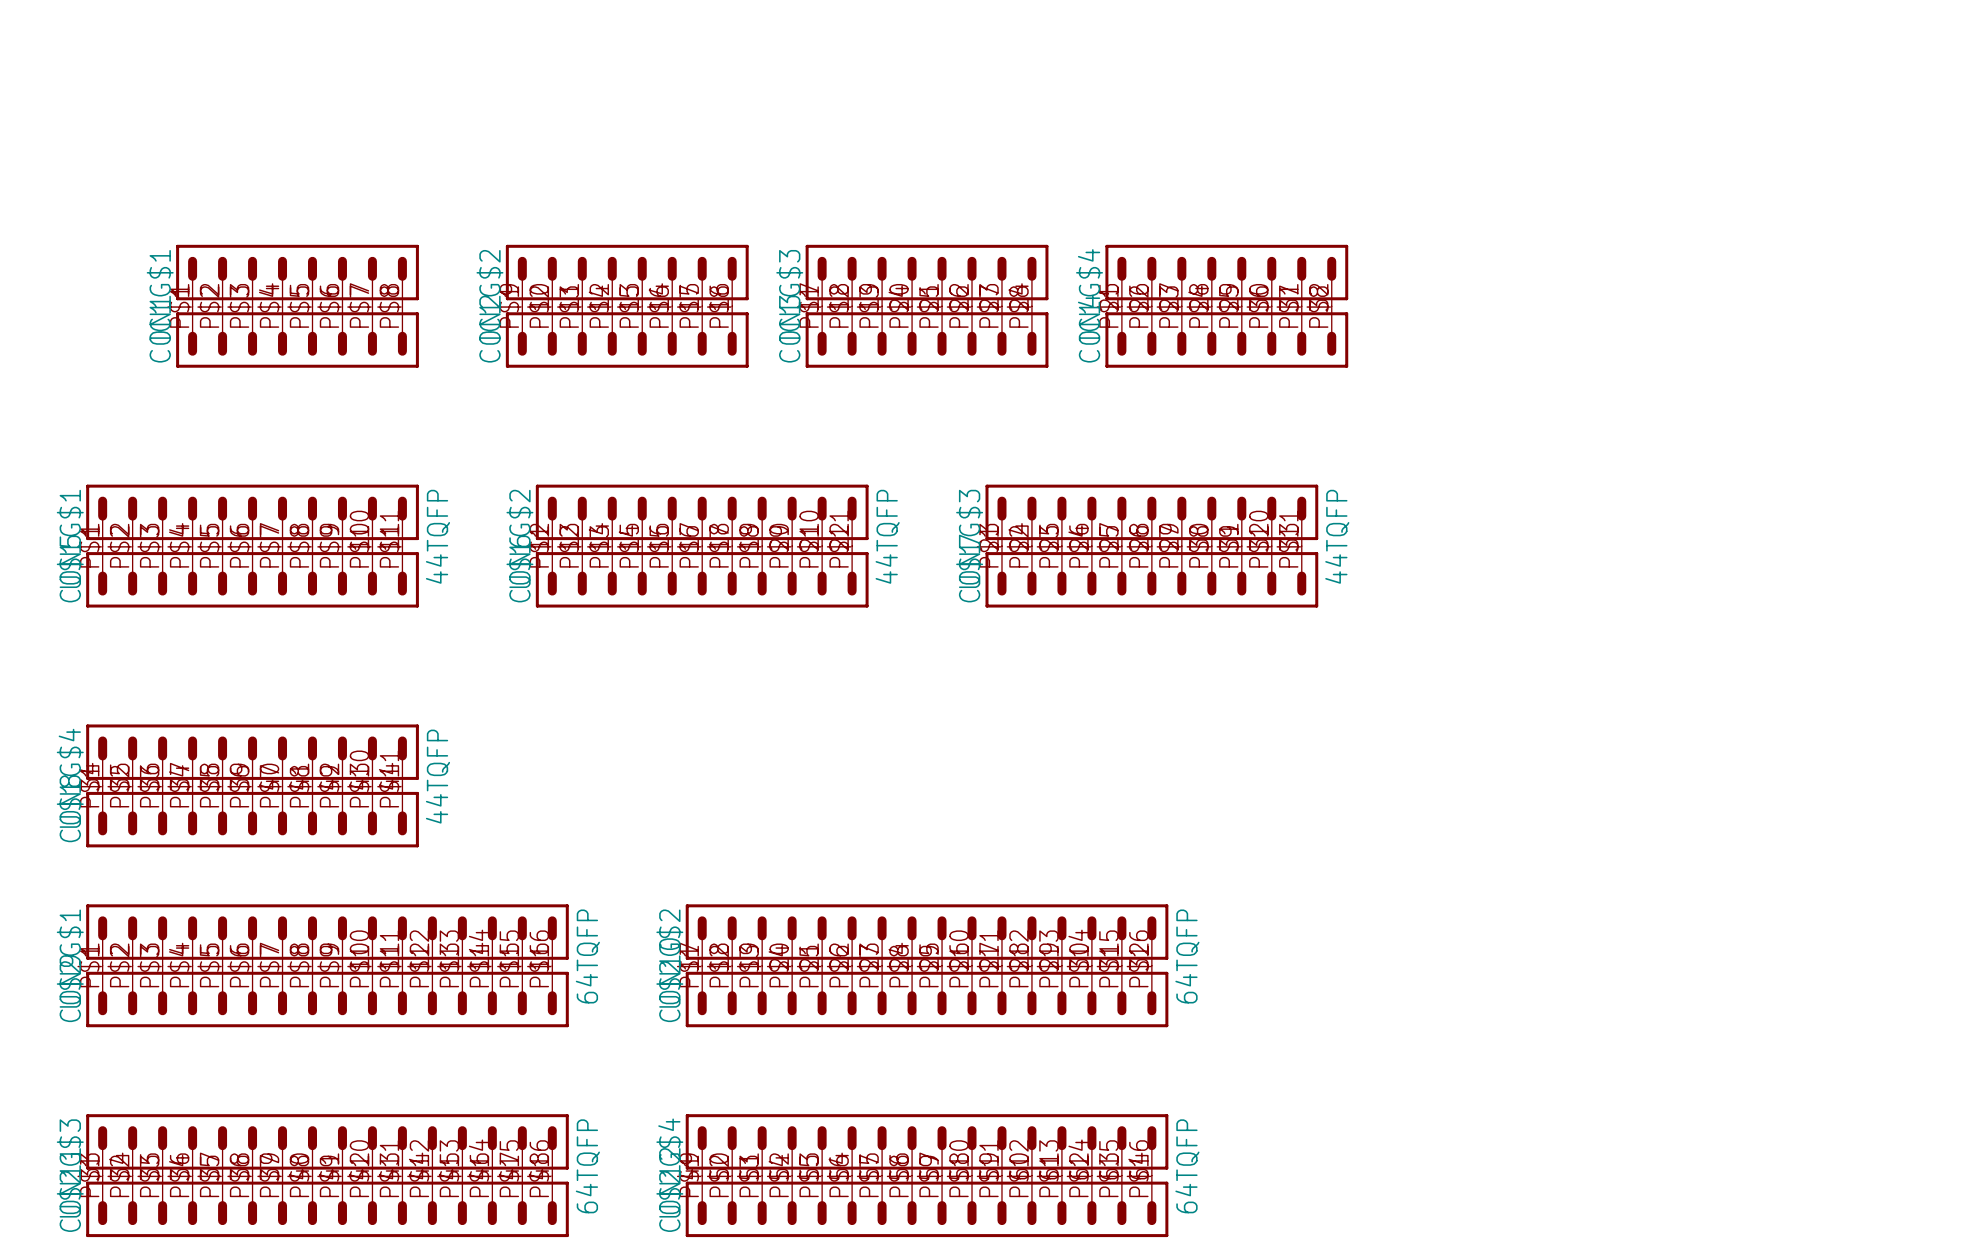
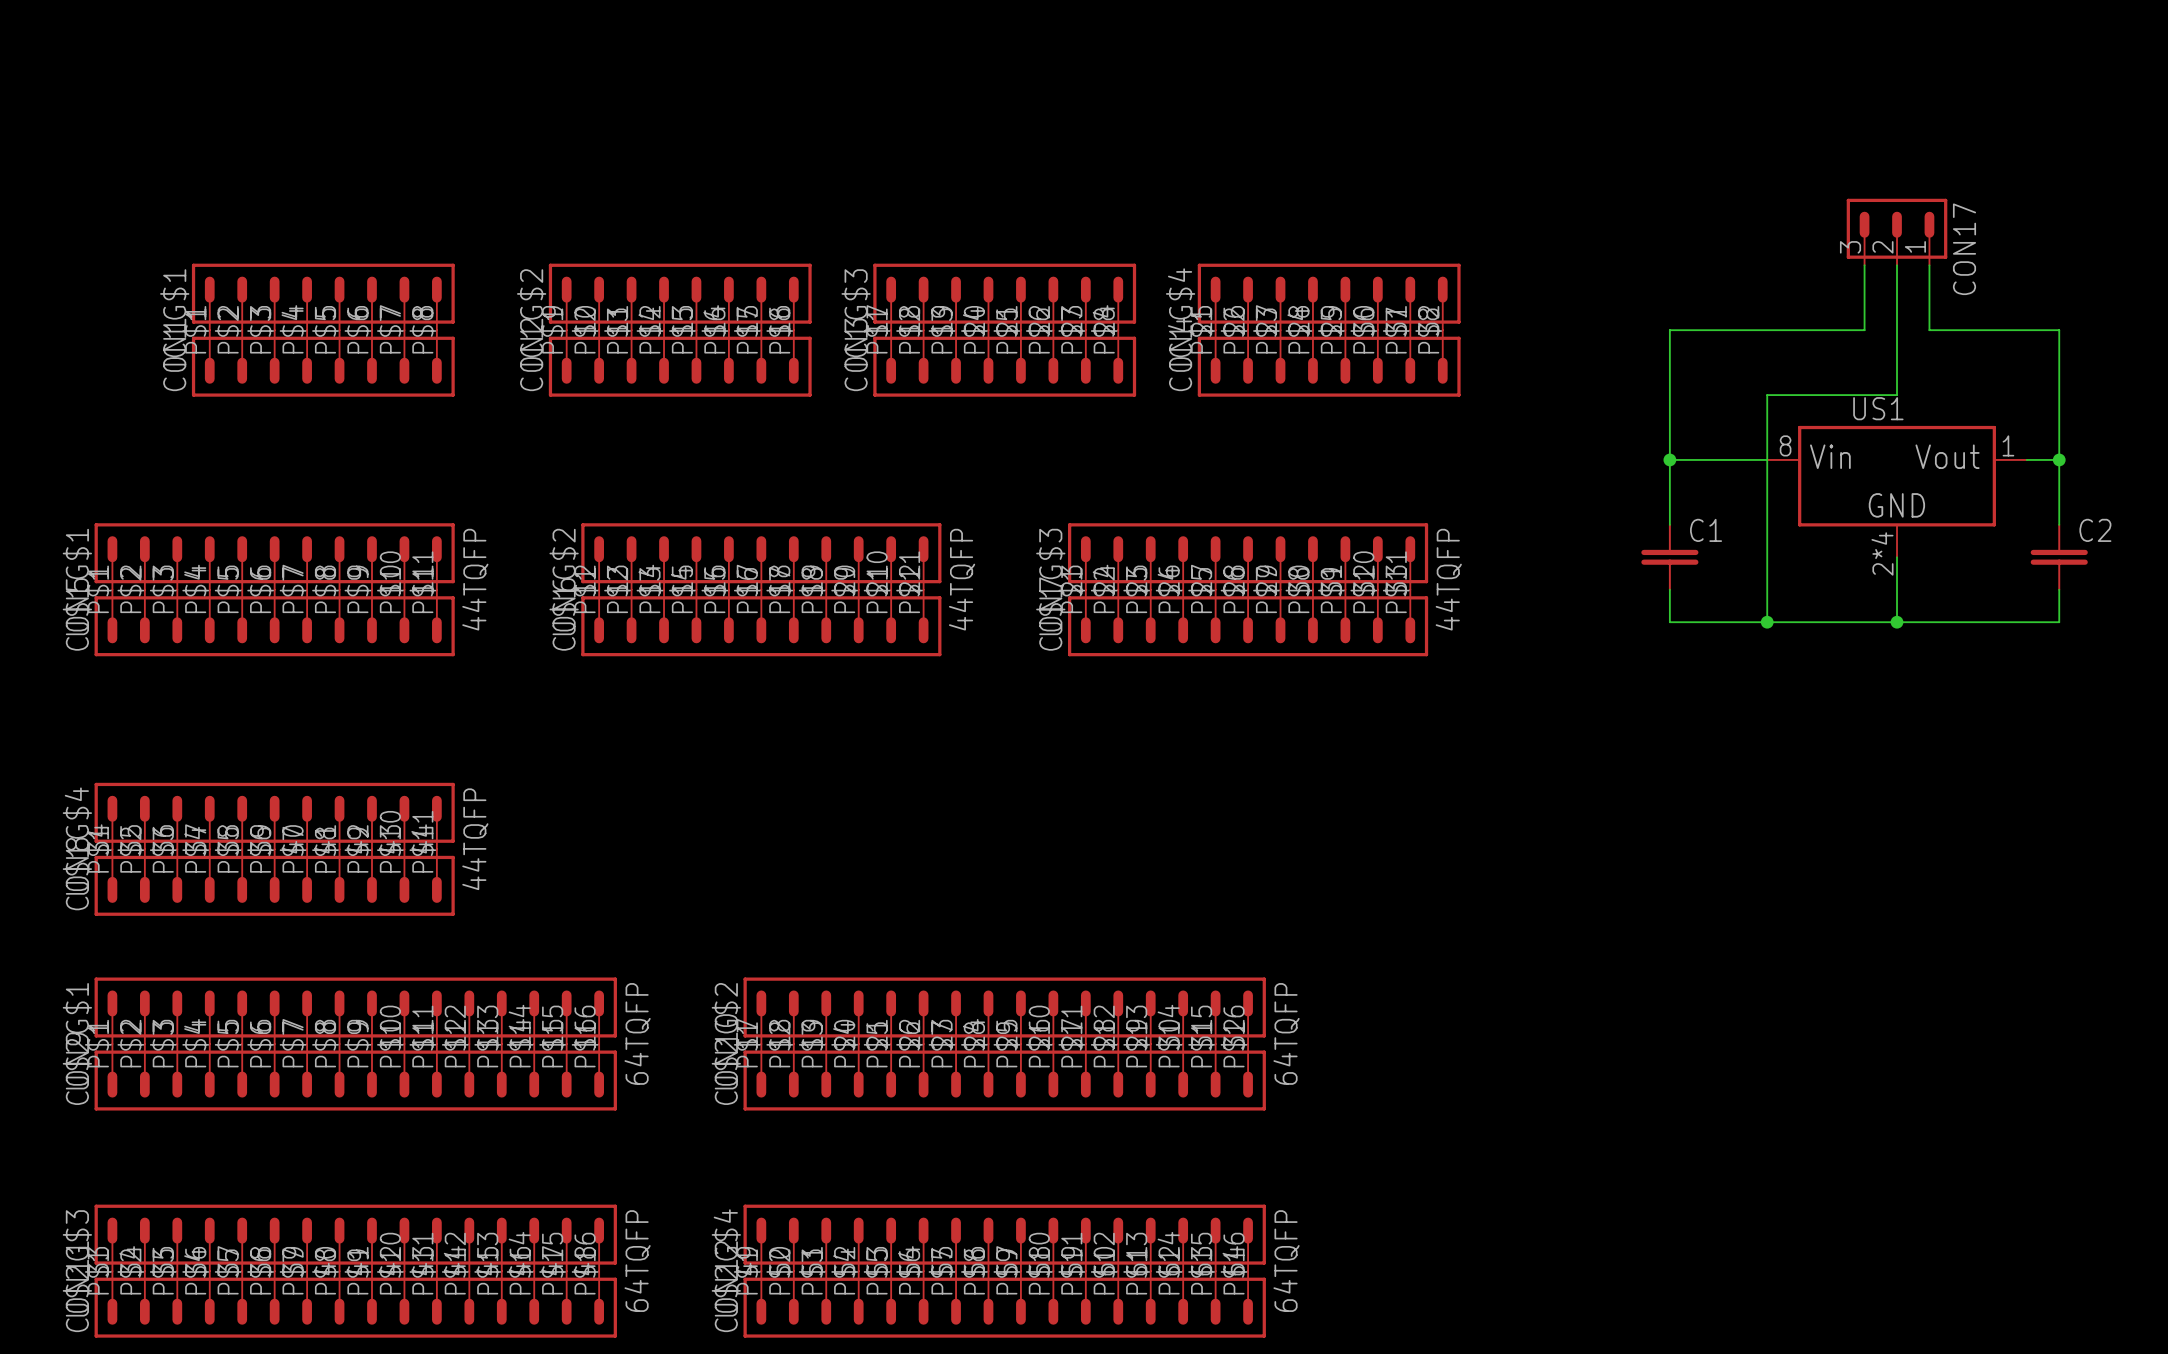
CON17: none -> (1897, 232)
wire: none -> (1864, 265) (1864, 330) (1669, 330) (1669, 524)
wire: none -> (1897, 265) (1897, 395) (1767, 395) (1767, 622)
wire: none -> (1929, 265) (1929, 330) (2059, 330) (2059, 524)
wire: none -> (1669, 459) (1767, 459)
junction: none -> (1669, 459)
wire: none -> (2026, 459) (2059, 459)
junction: none -> (2059, 459)
US1: none -> (1897, 491)
C1: none -> (1669, 557)
wire: none -> (1897, 557) (1897, 622)
C2: none -> (2059, 557)
wire: none -> (1669, 589) (1669, 622) (2059, 622) (2059, 589)
junction: none -> (1767, 622)
junction: none -> (1897, 622)

